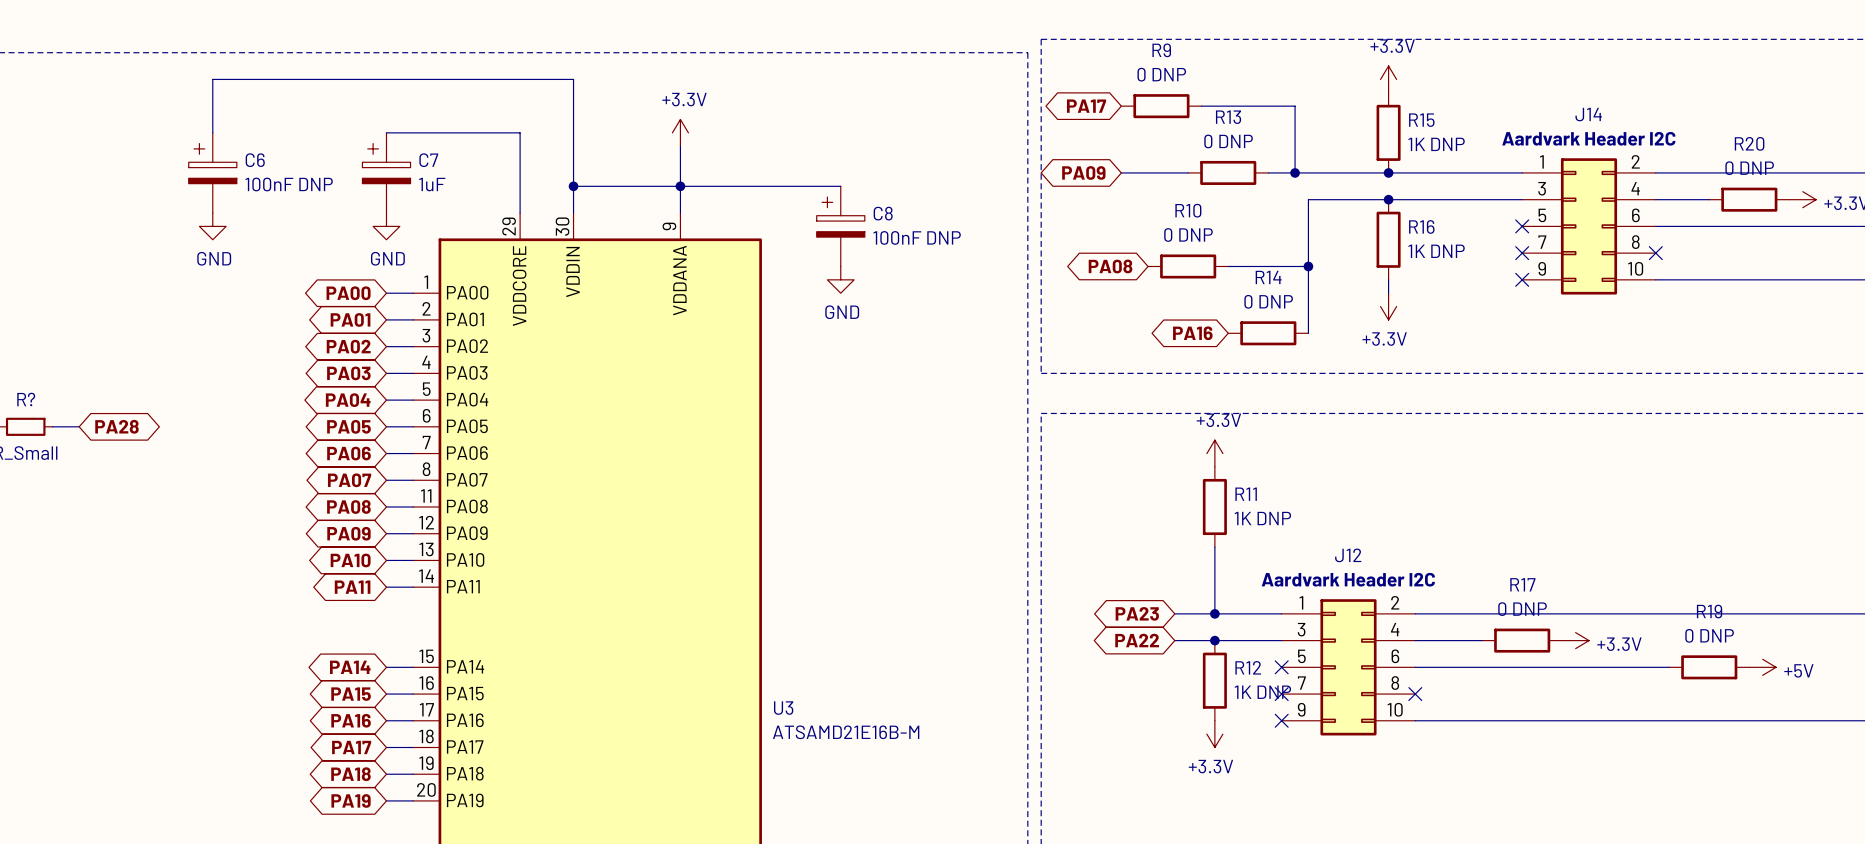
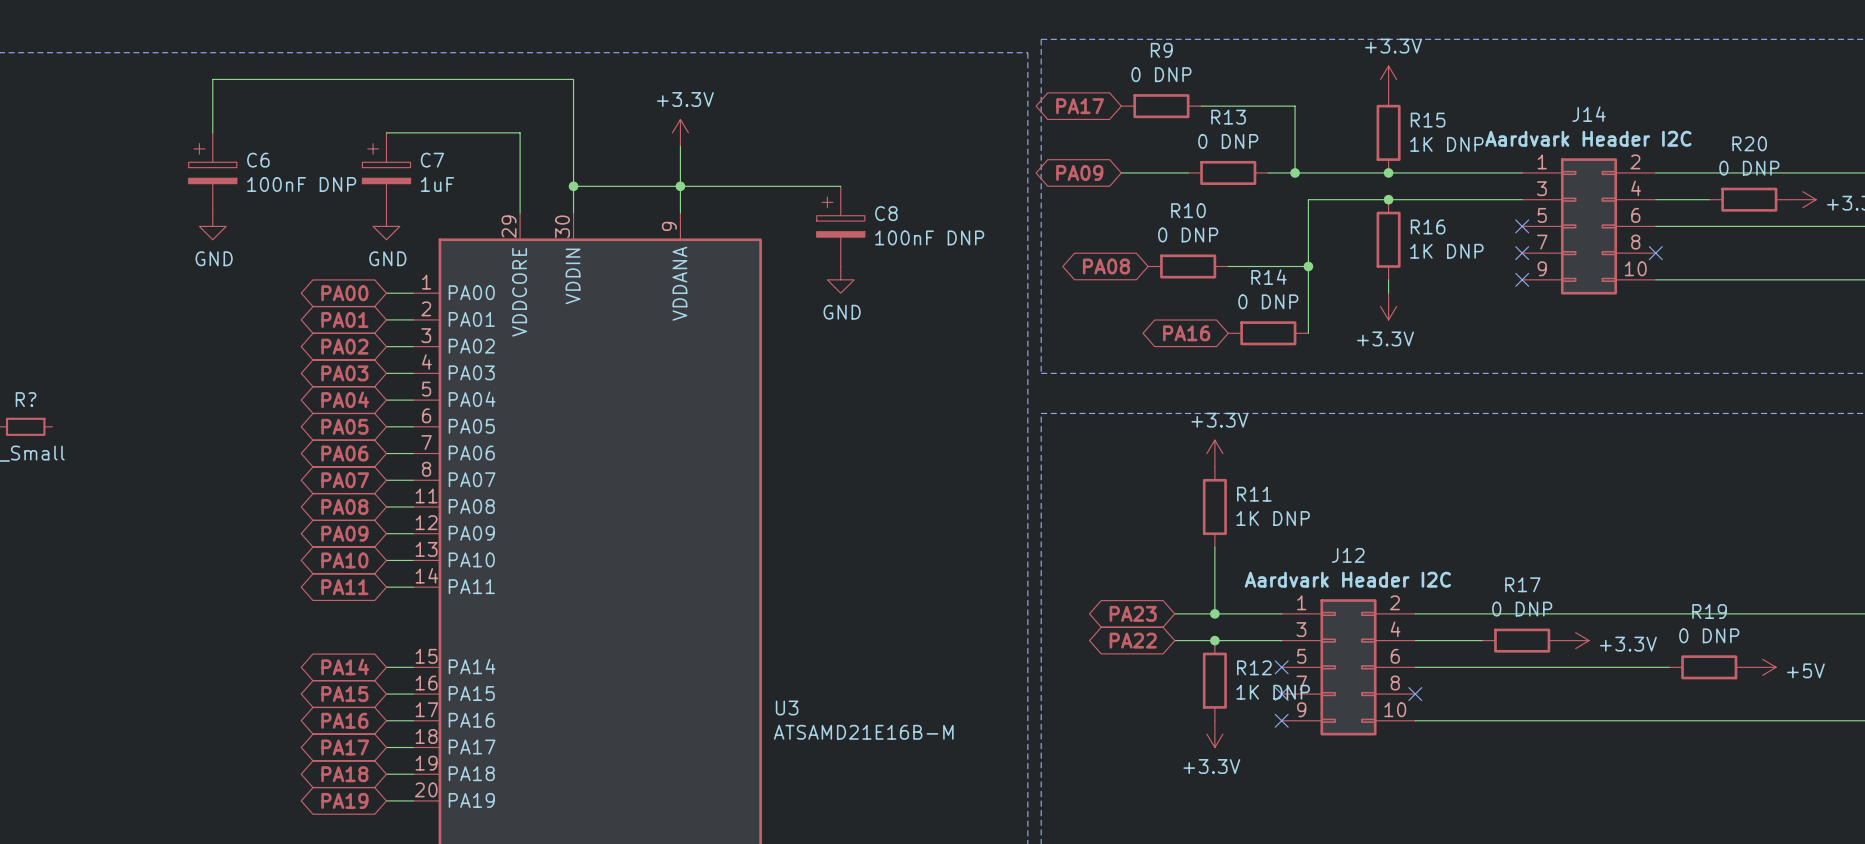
wire: (52, 426) (79, 426) -> none
global label: PA28 (116, 426) -> none

